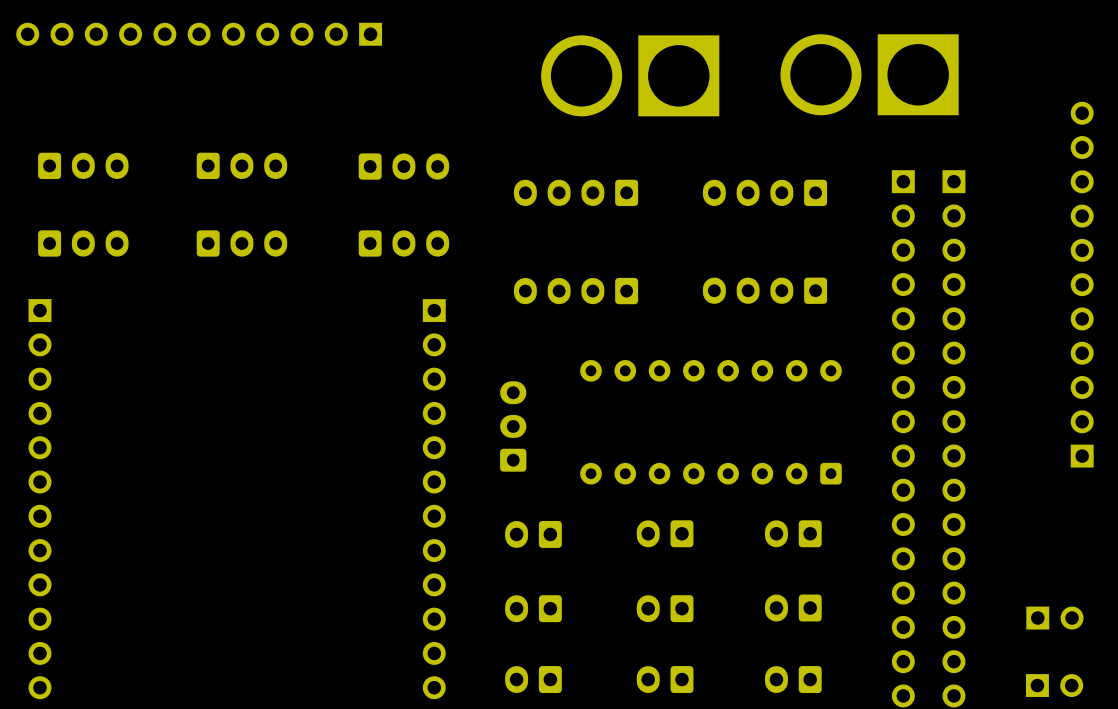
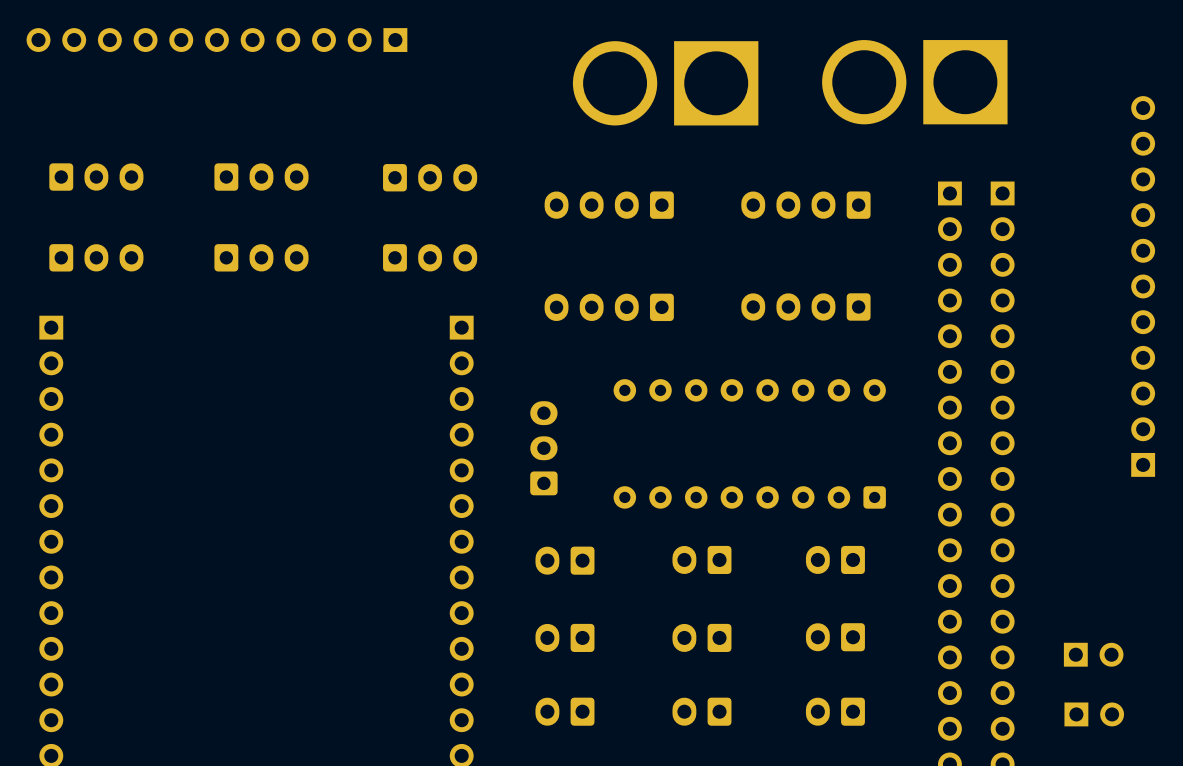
part position: (1082, 284) -> (1143, 286)
part position: (1054, 618) -> (1093, 654)
part position: (1054, 685) -> (1094, 714)

